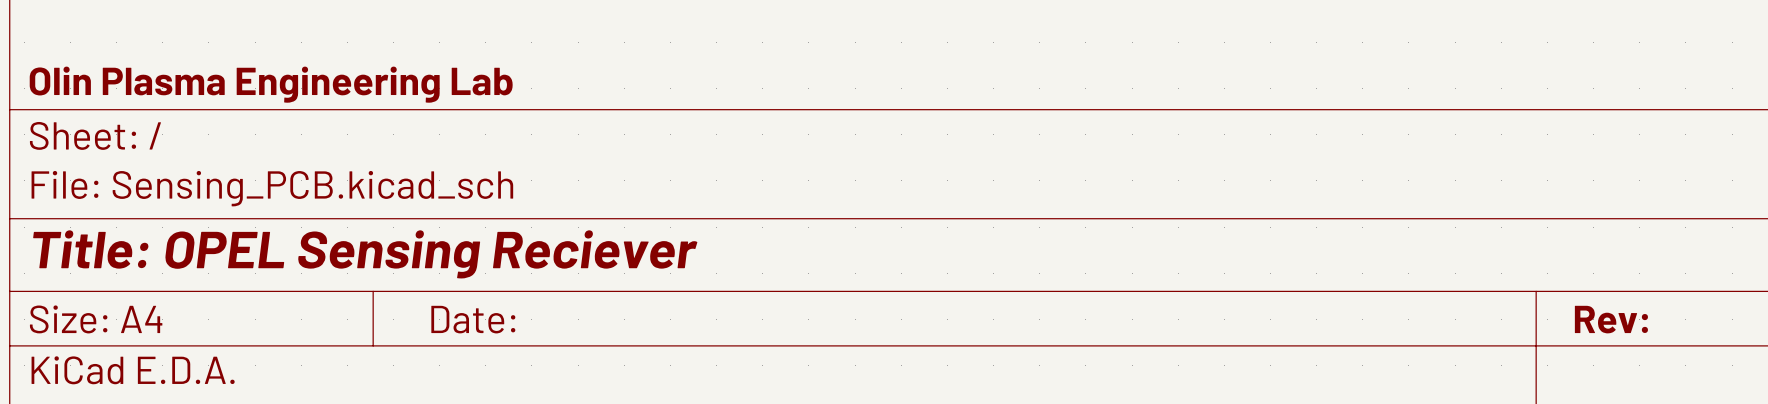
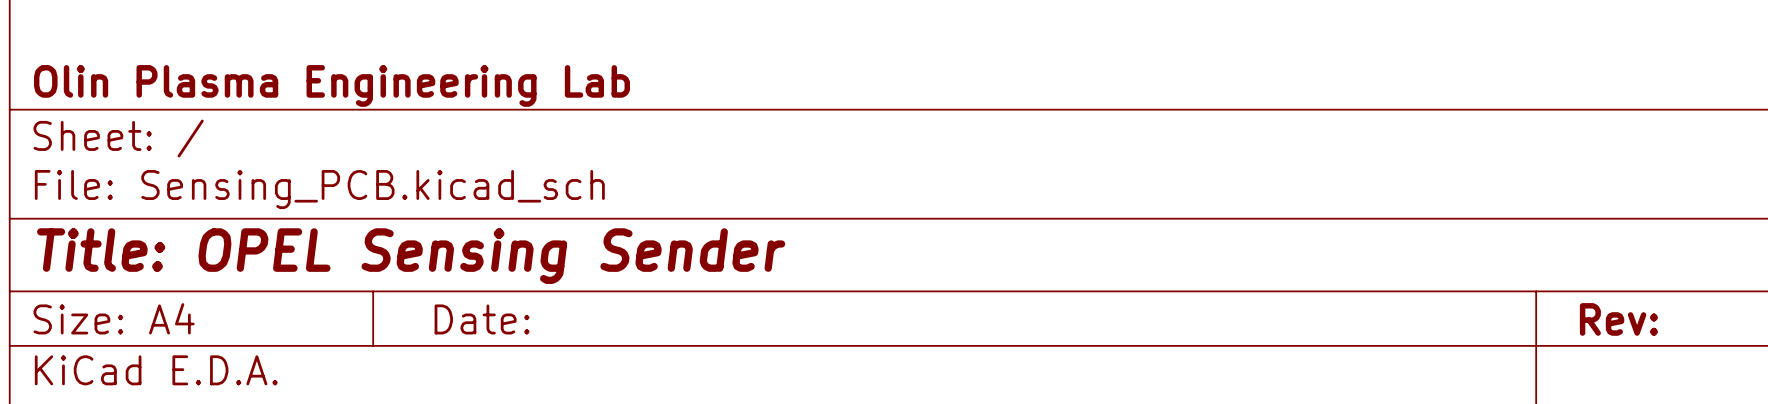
title block: Title: OPEL Sensing Reciever (365, 254) -> Title: OPEL Sensing Sender (411, 256)

